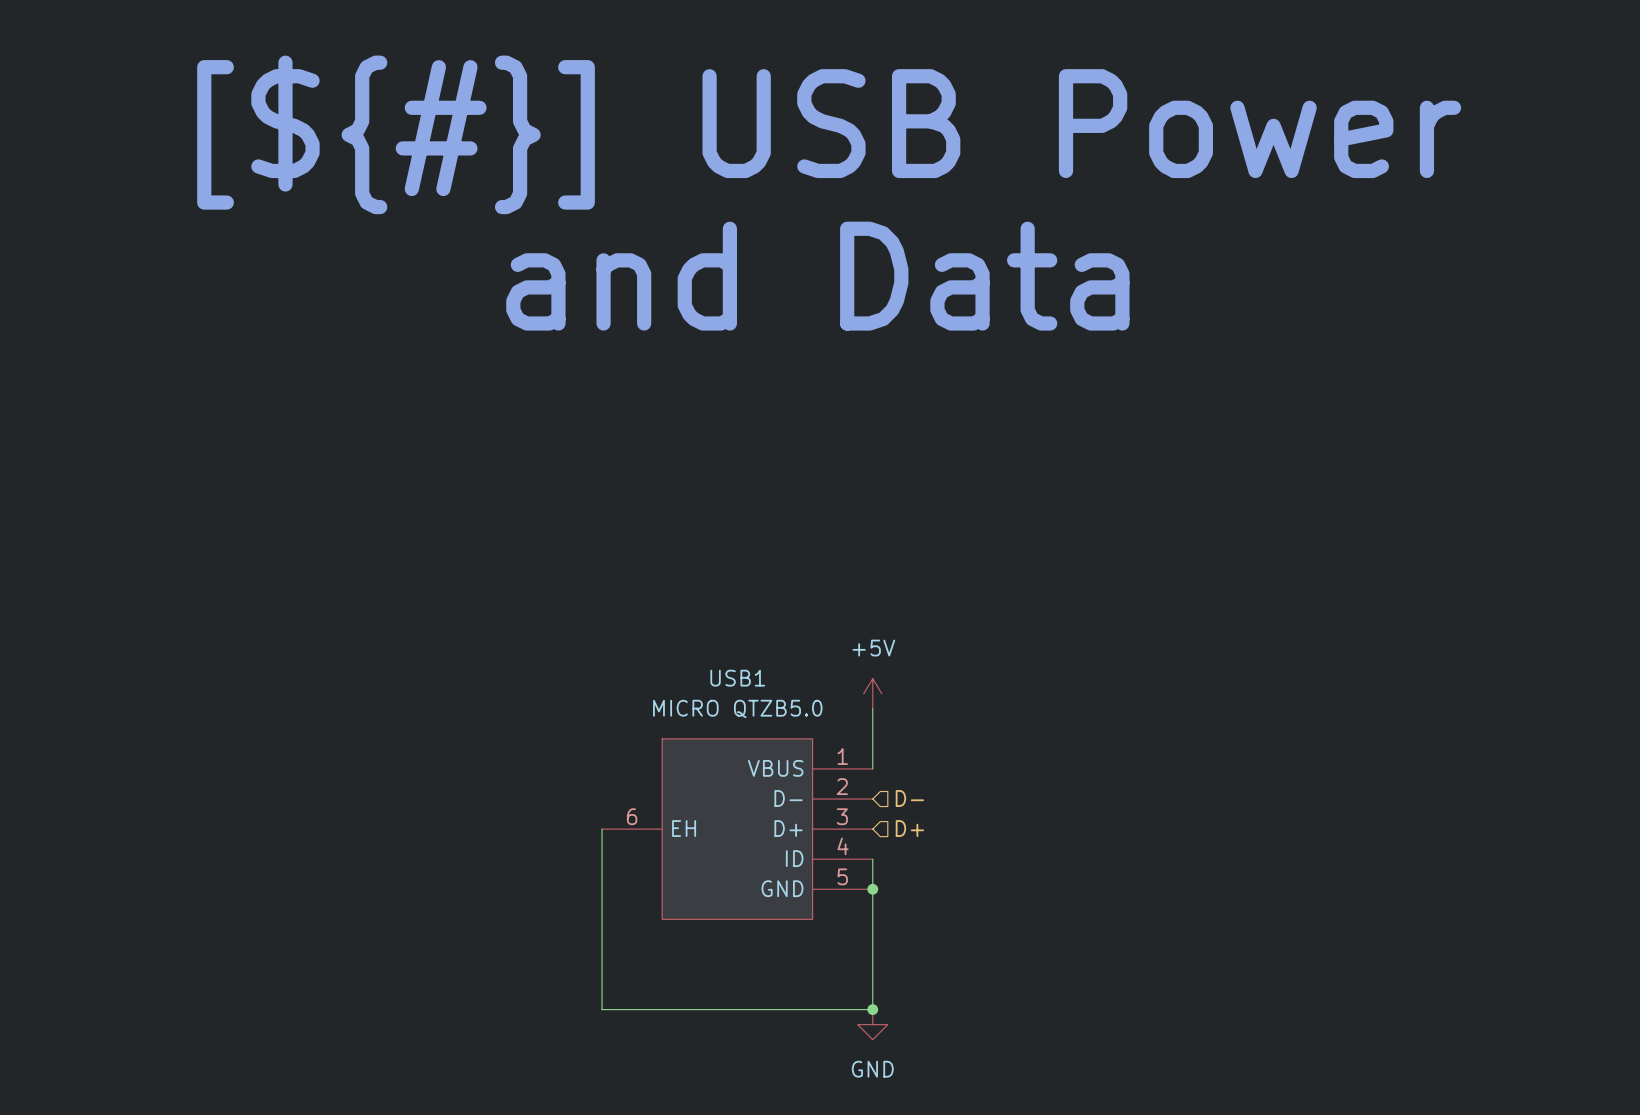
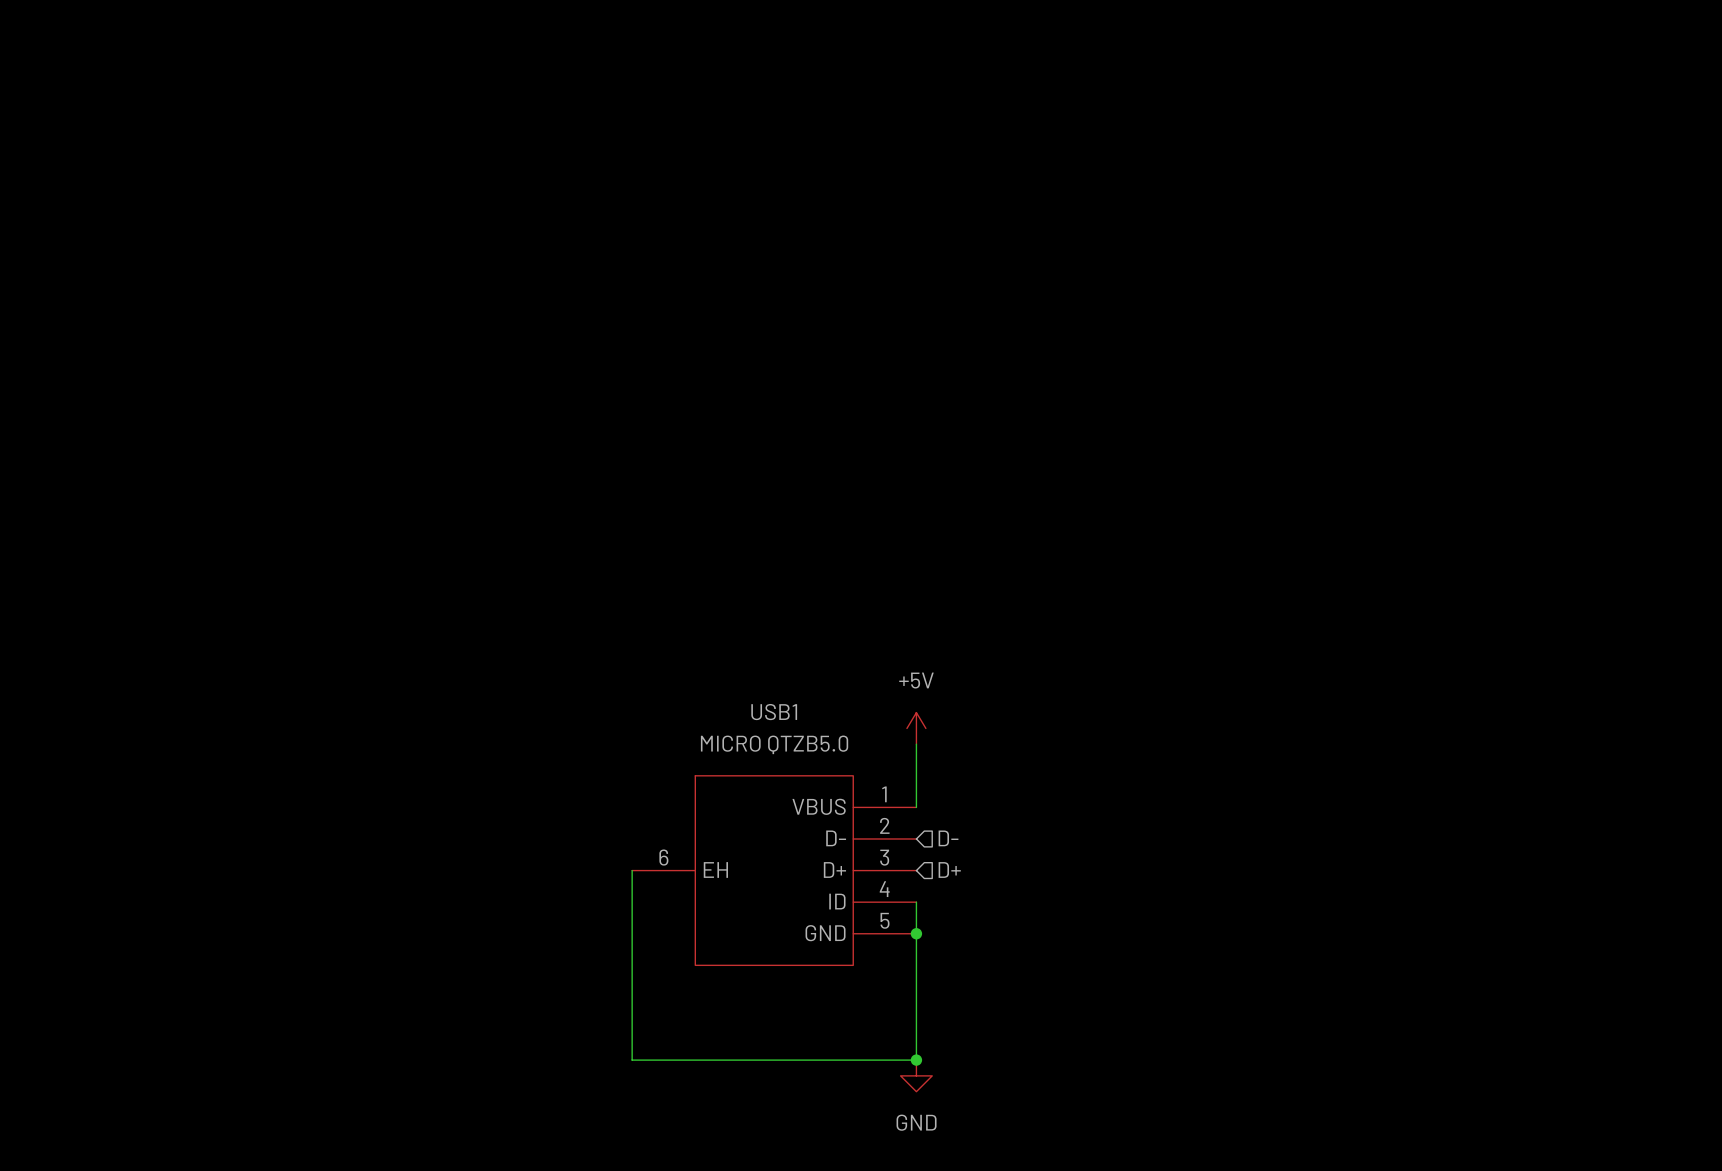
text: [${#}] USB Power (829, 134) -> none
text: and Data (817, 276) -> none

